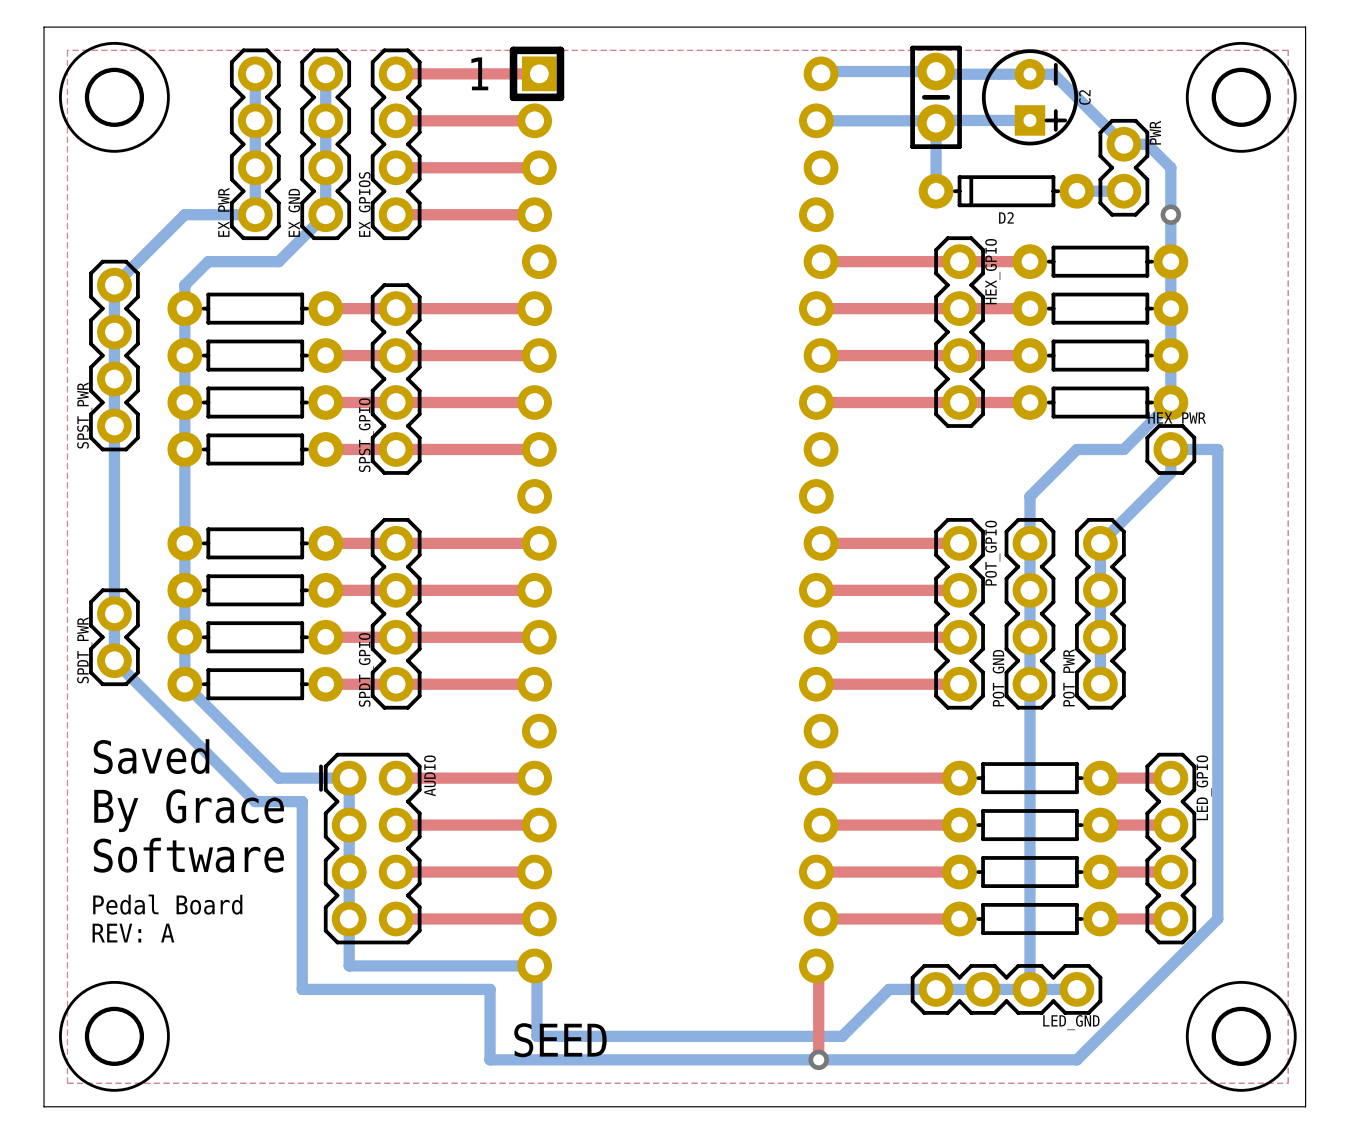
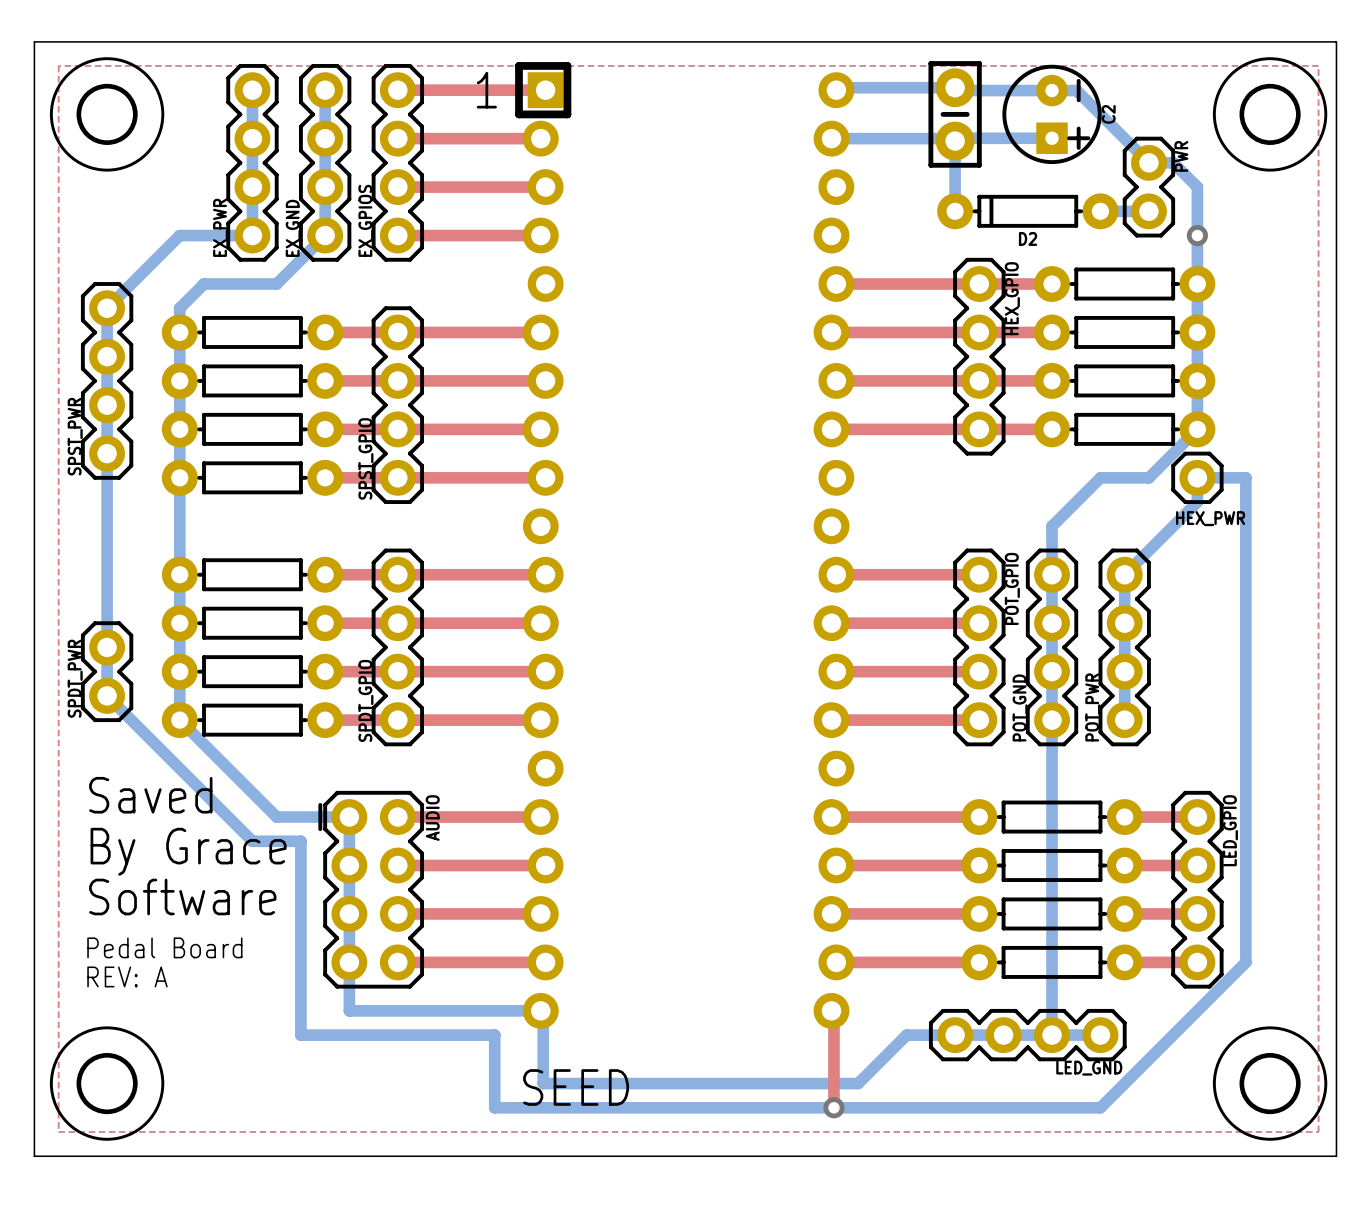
HEX_PWR name position: HEX_PWR (1177, 419) -> HEX_PWR (1210, 518)

